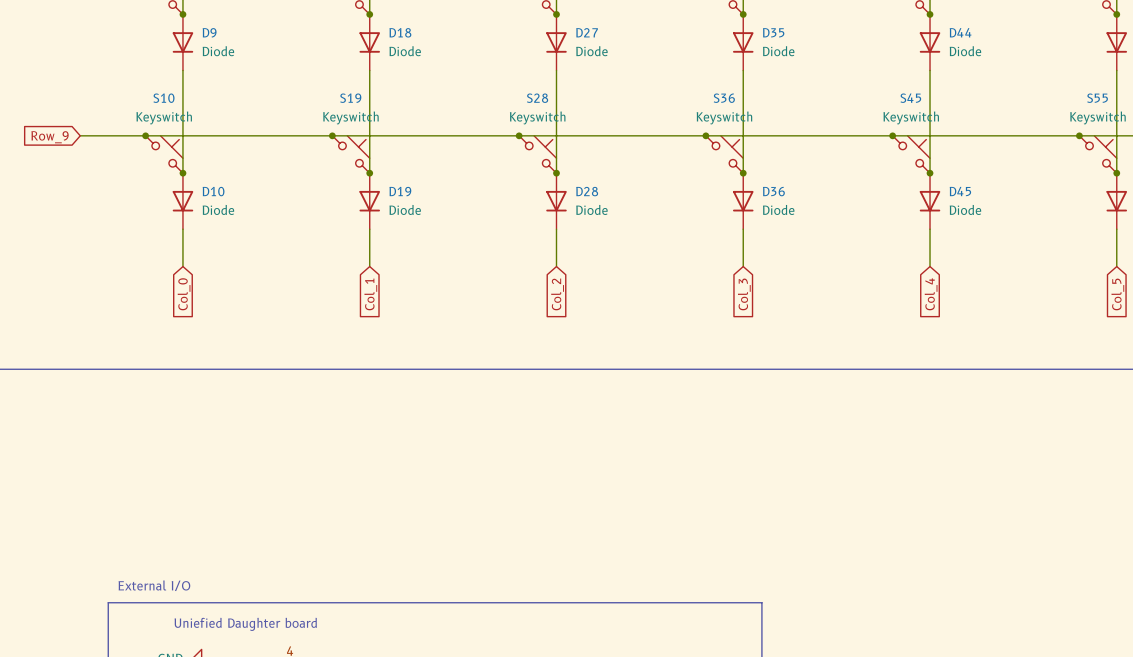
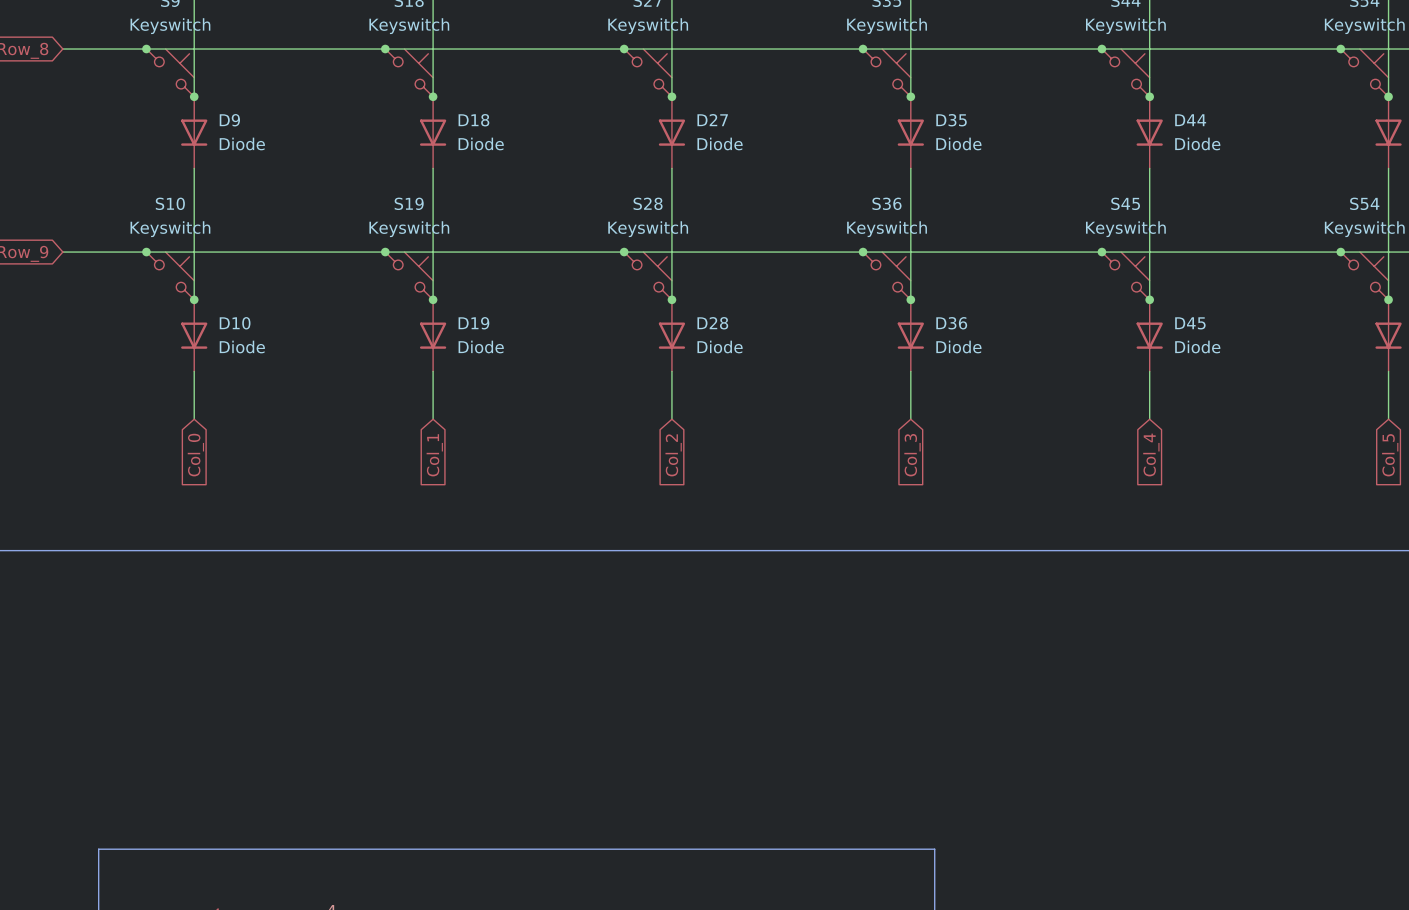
S55 name: S55 (1097, 98) -> S54 (1364, 203)
text: External I/O (154, 585) -> none
text: Uniefied Daughter board (245, 624) -> none

